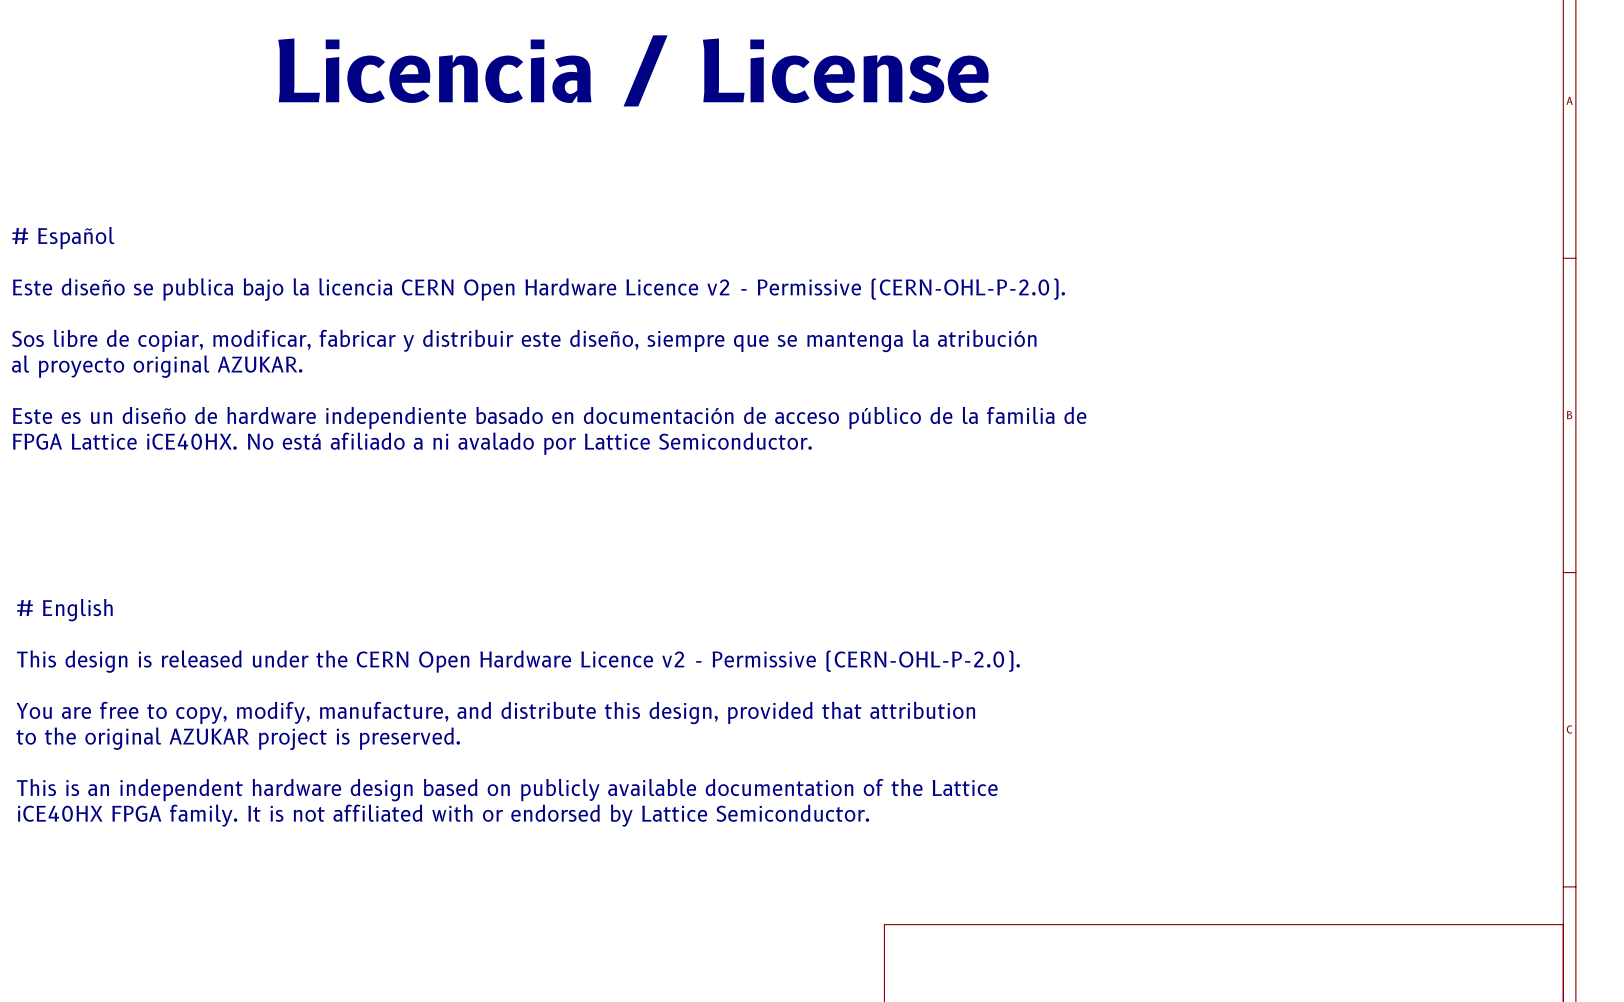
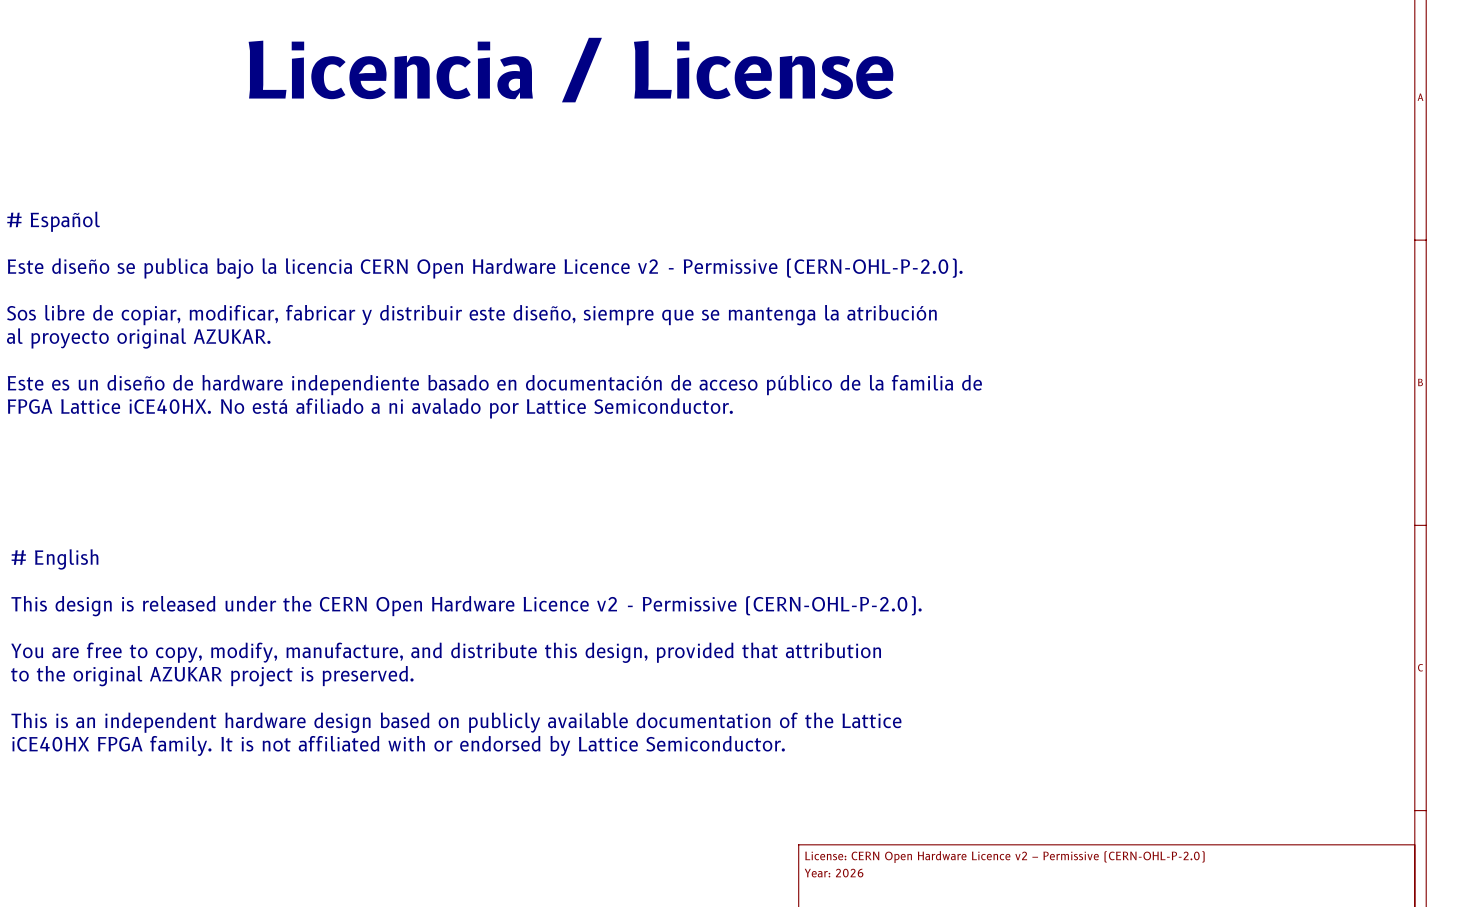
title block: none -> License: CERN Open Hardware Licence v2 – Permissive (CERN-OHL-P-2.0) (1004, 857)
title block: none -> Year: 2026 (834, 873)

